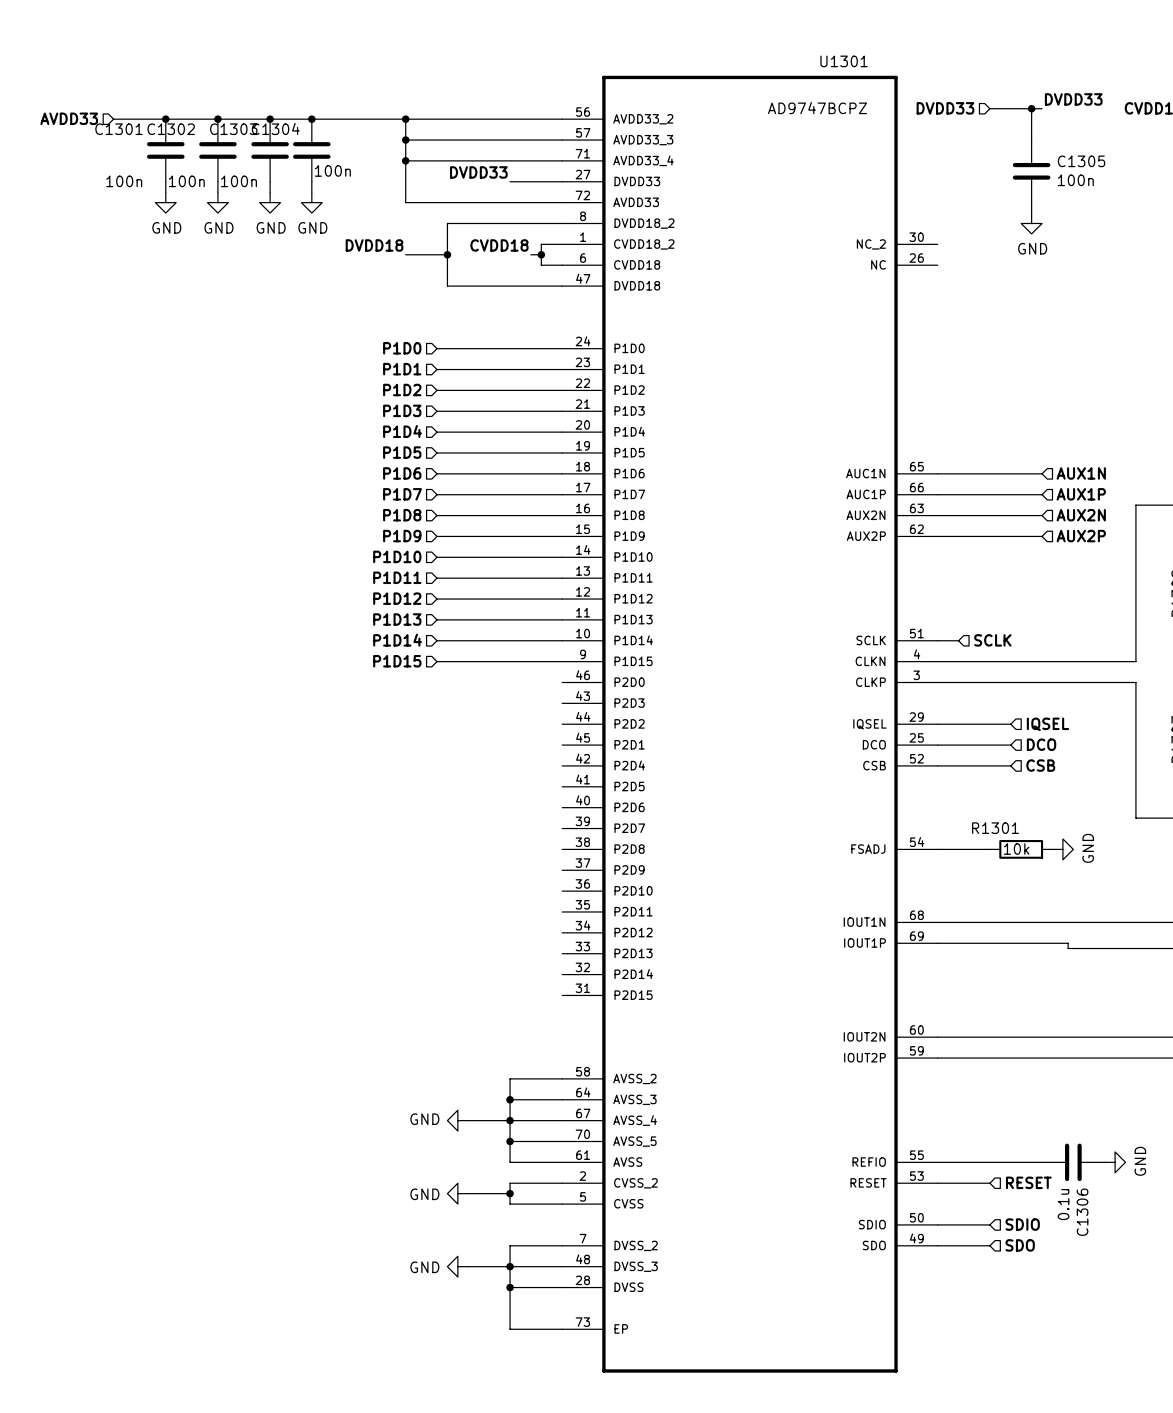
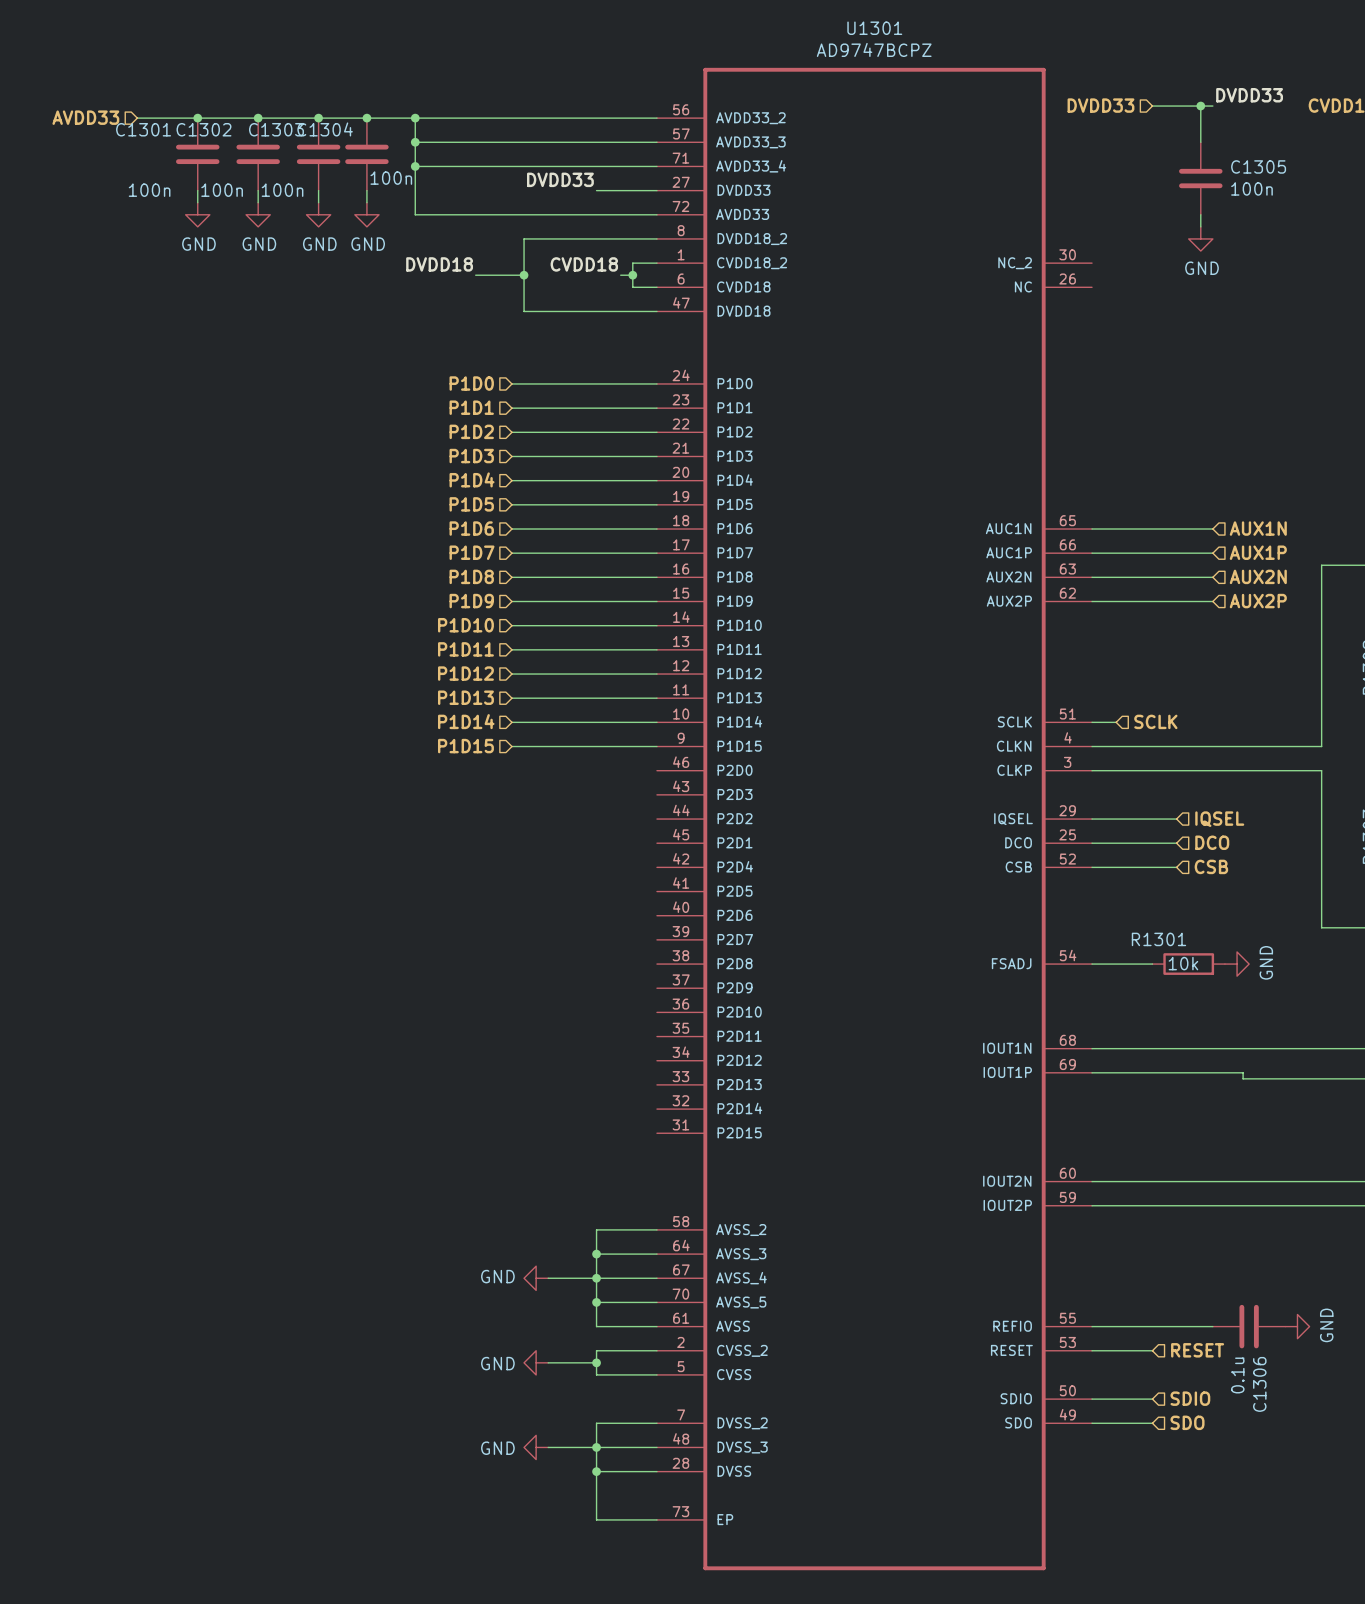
U1301 name position: U1301 (844, 61) -> U1301 (874, 28)
U1301 value position: AD9747BCPZ (817, 108) -> AD9747BCPZ (874, 49)
junction: none -> (415, 118)
wire: (405, 119) (405, 202) -> (415, 118) (415, 214) (475, 214)
junction: (405, 119) -> none
wire: none -> (415, 142) (475, 142)
junction: none -> (415, 142)
junction: (405, 140) -> none
wire: none -> (415, 166) (475, 166)
junction: none -> (415, 166)
junction: (405, 160) -> none

